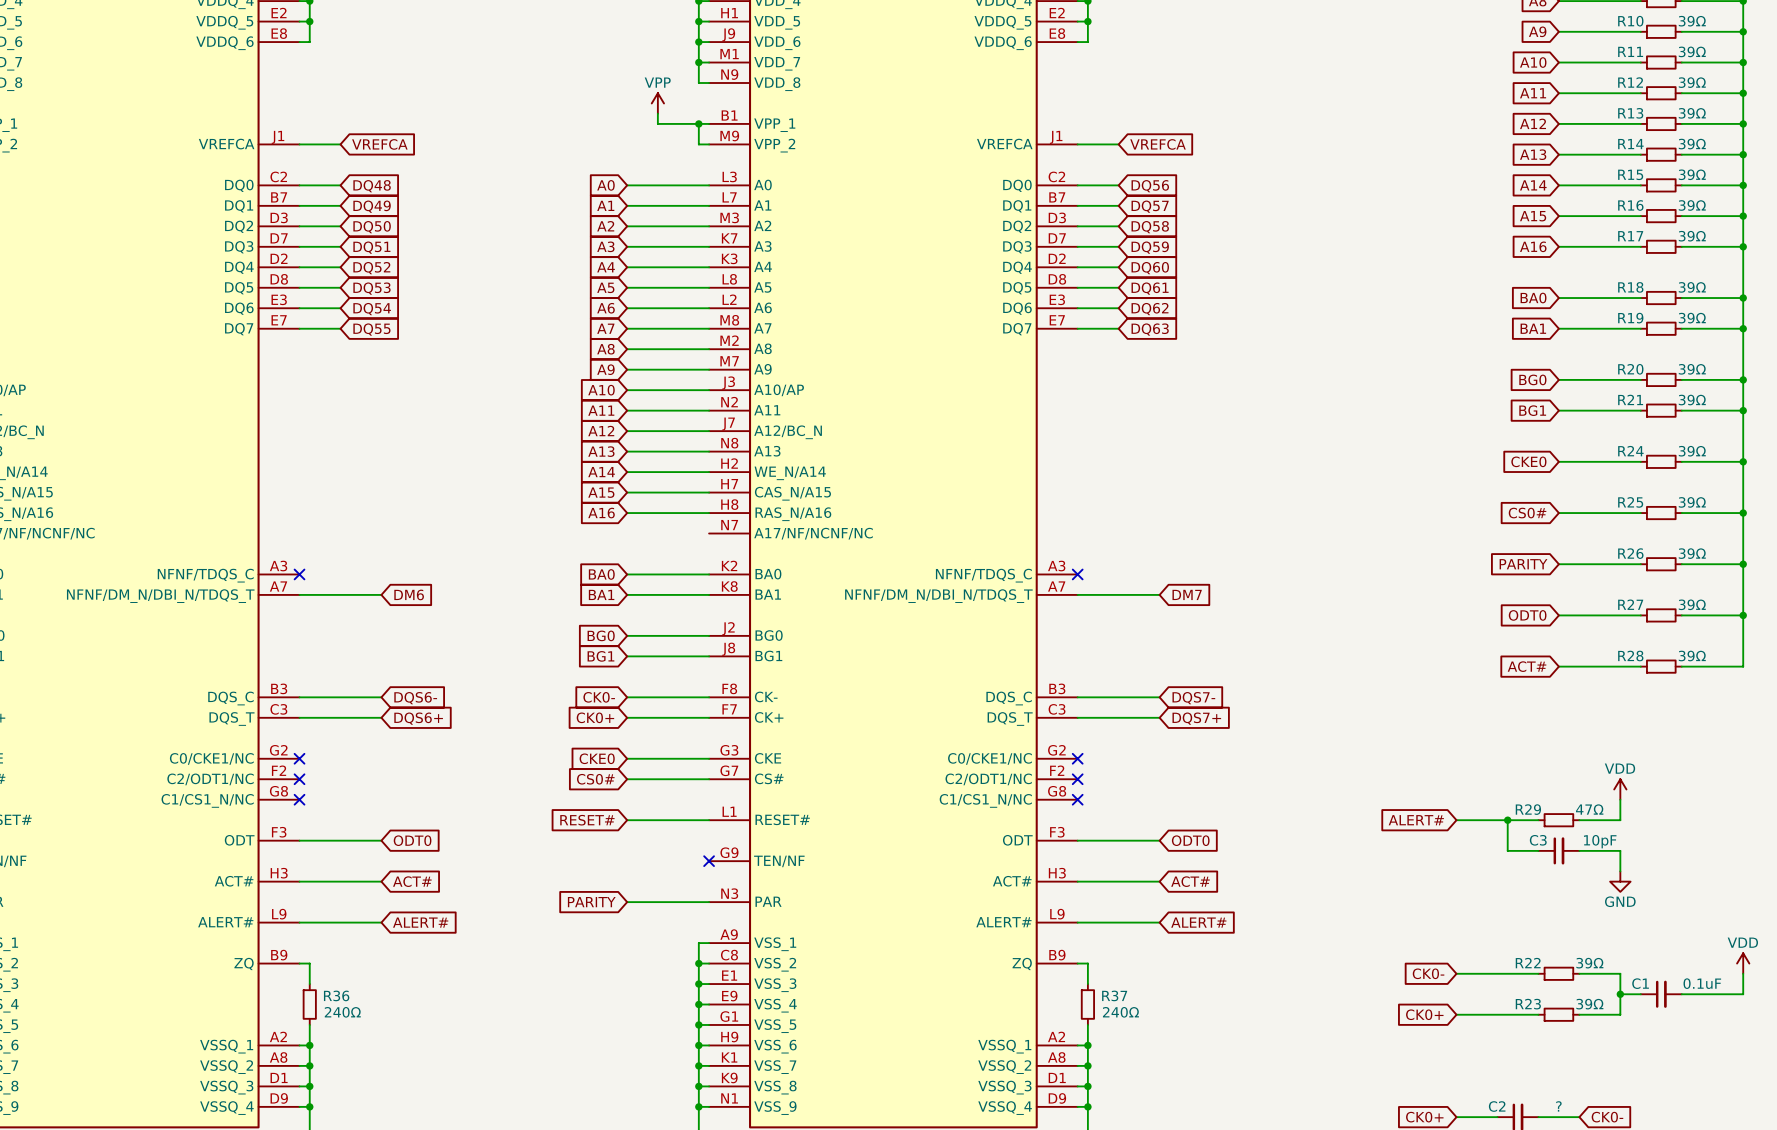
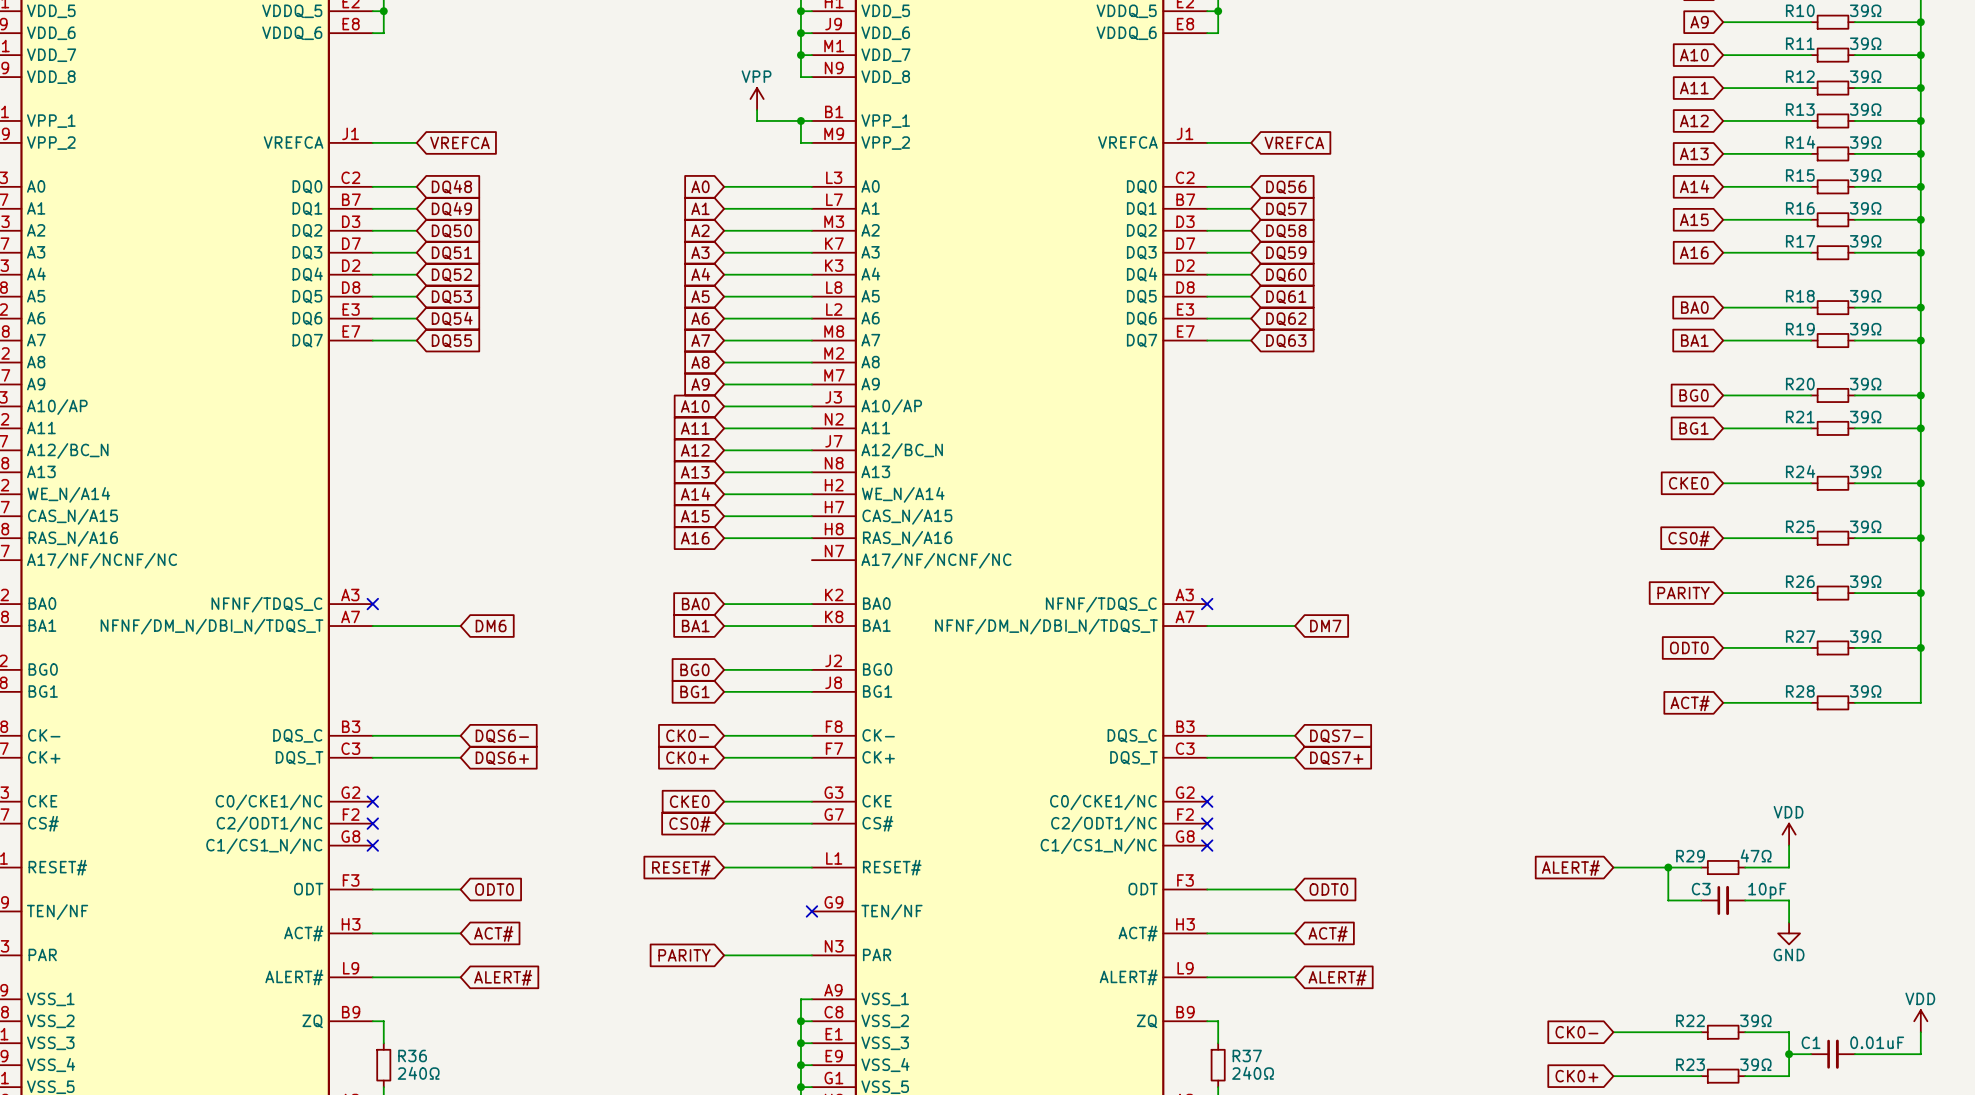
C1 value: 0.1uF (1702, 983) -> 0.01uF (1877, 1042)

